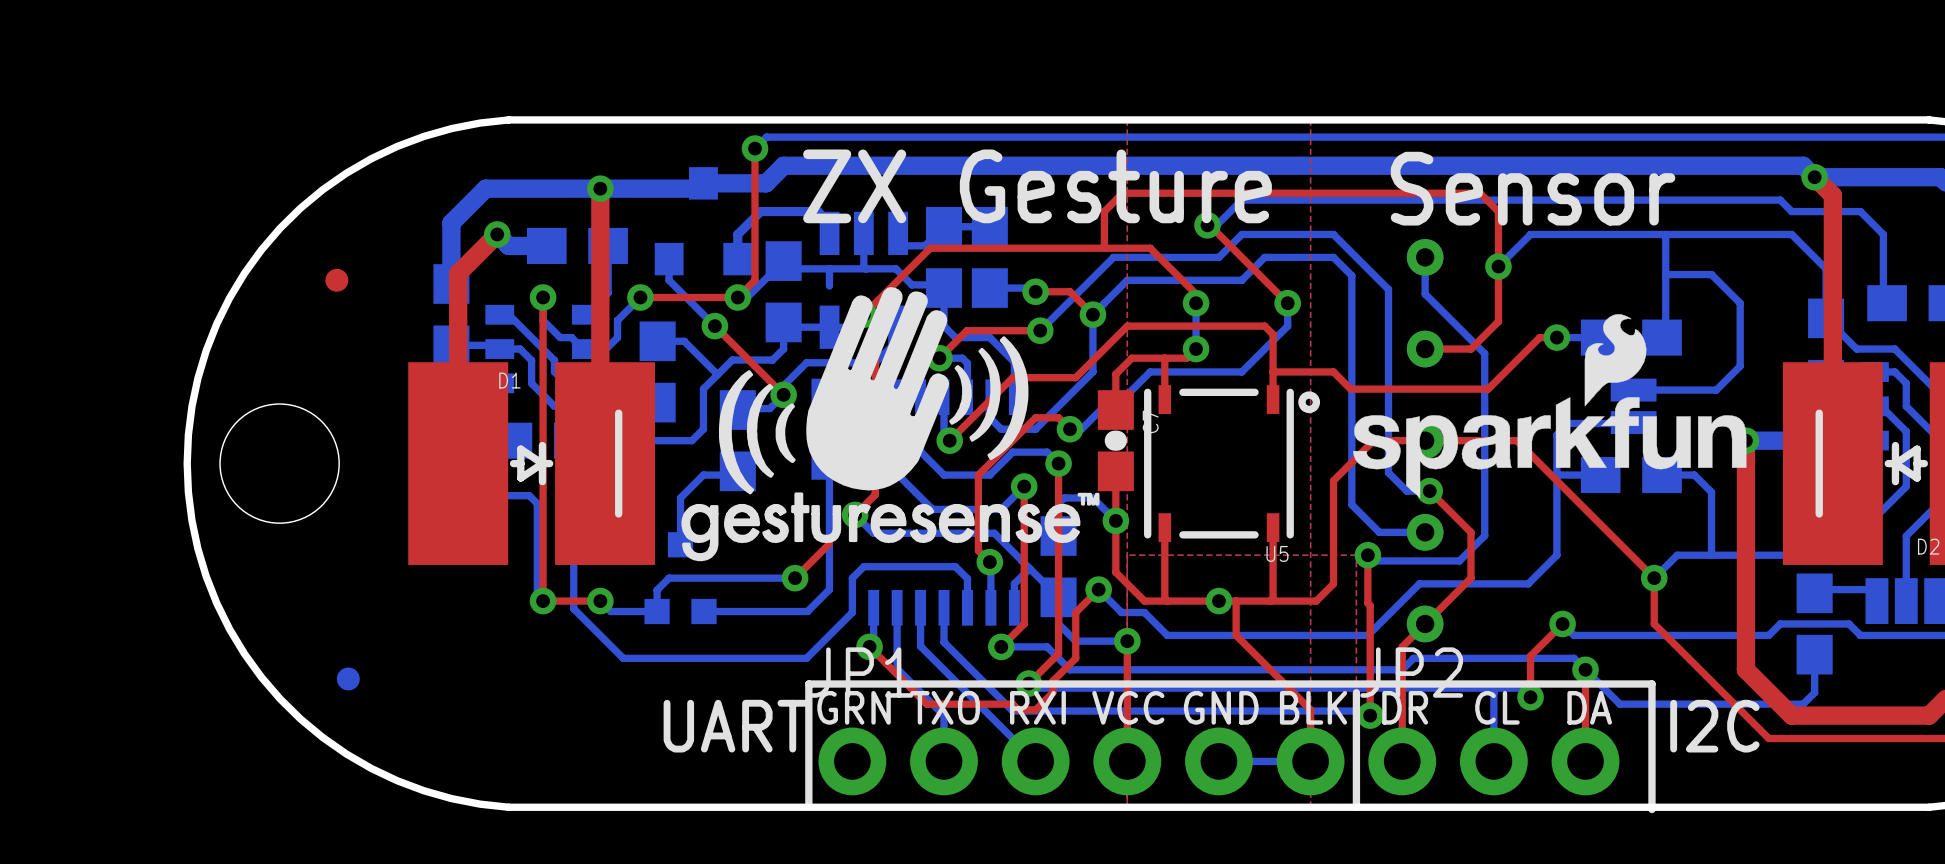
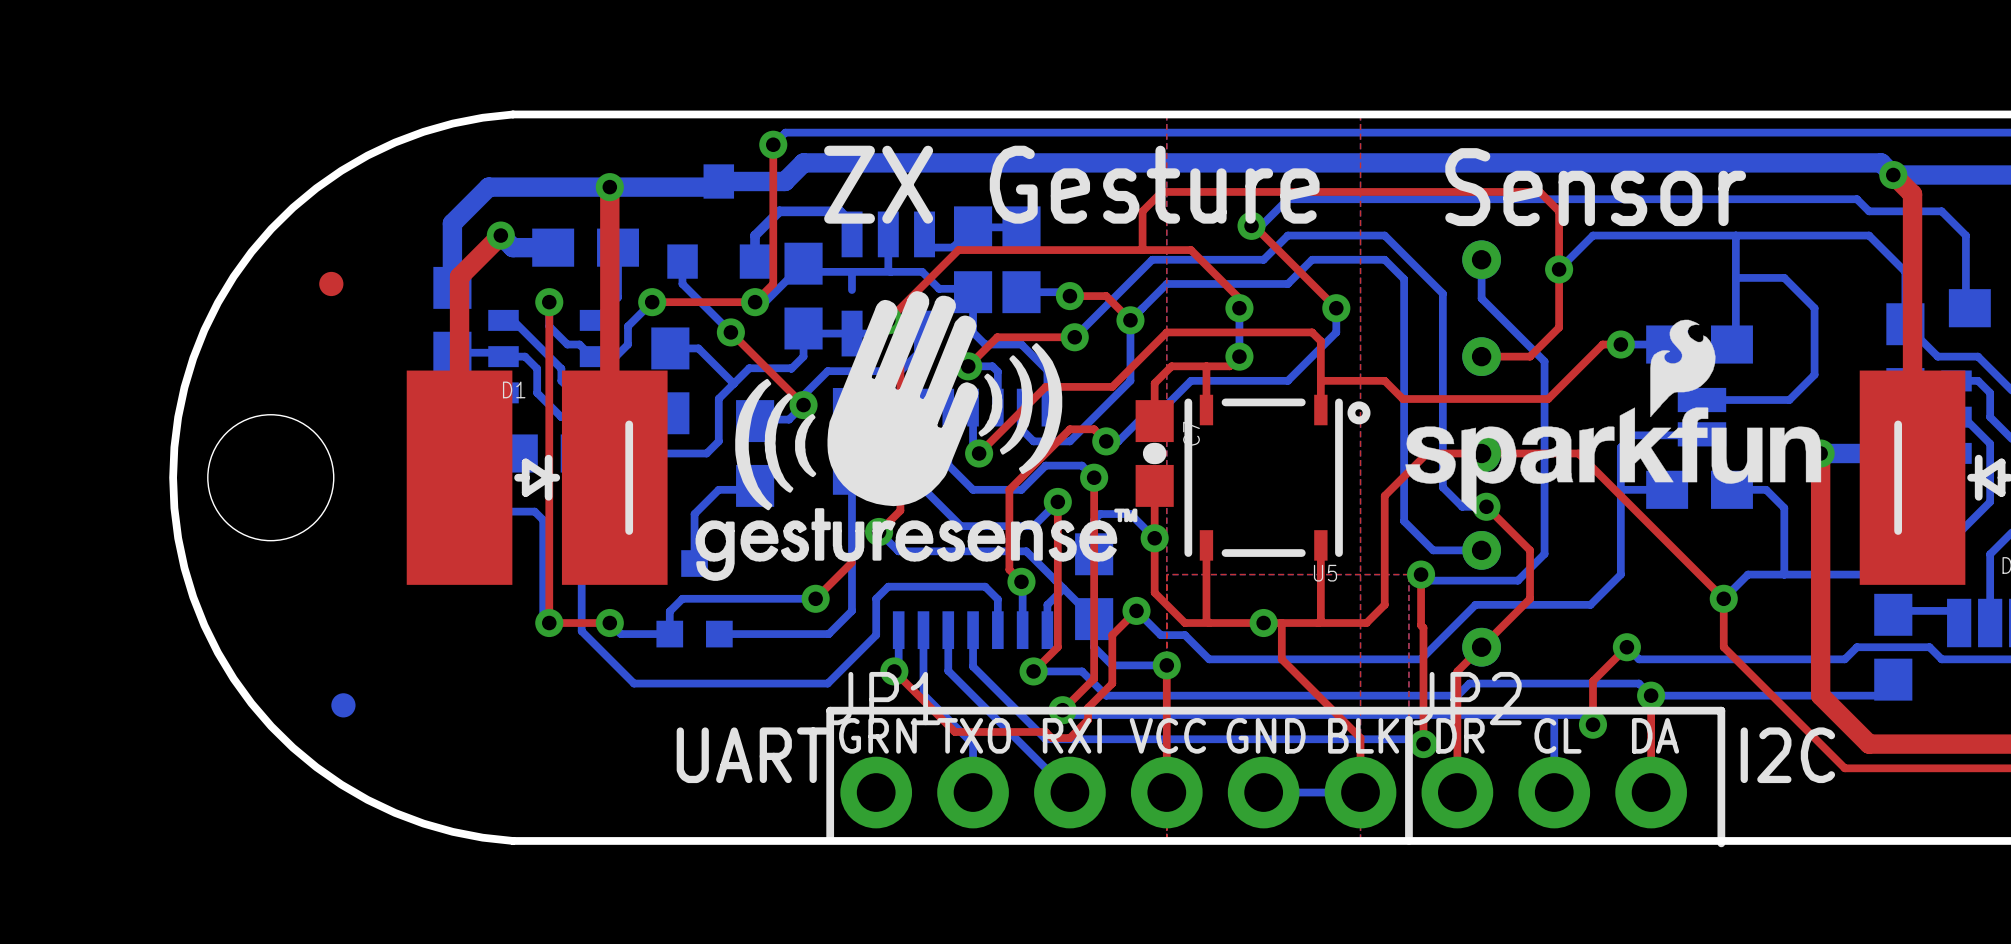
bottom track: (1585, 669) (1619, 704) (1803, 704) (1814, 692) (1814, 669) -> (1651, 695) (1893, 695)

